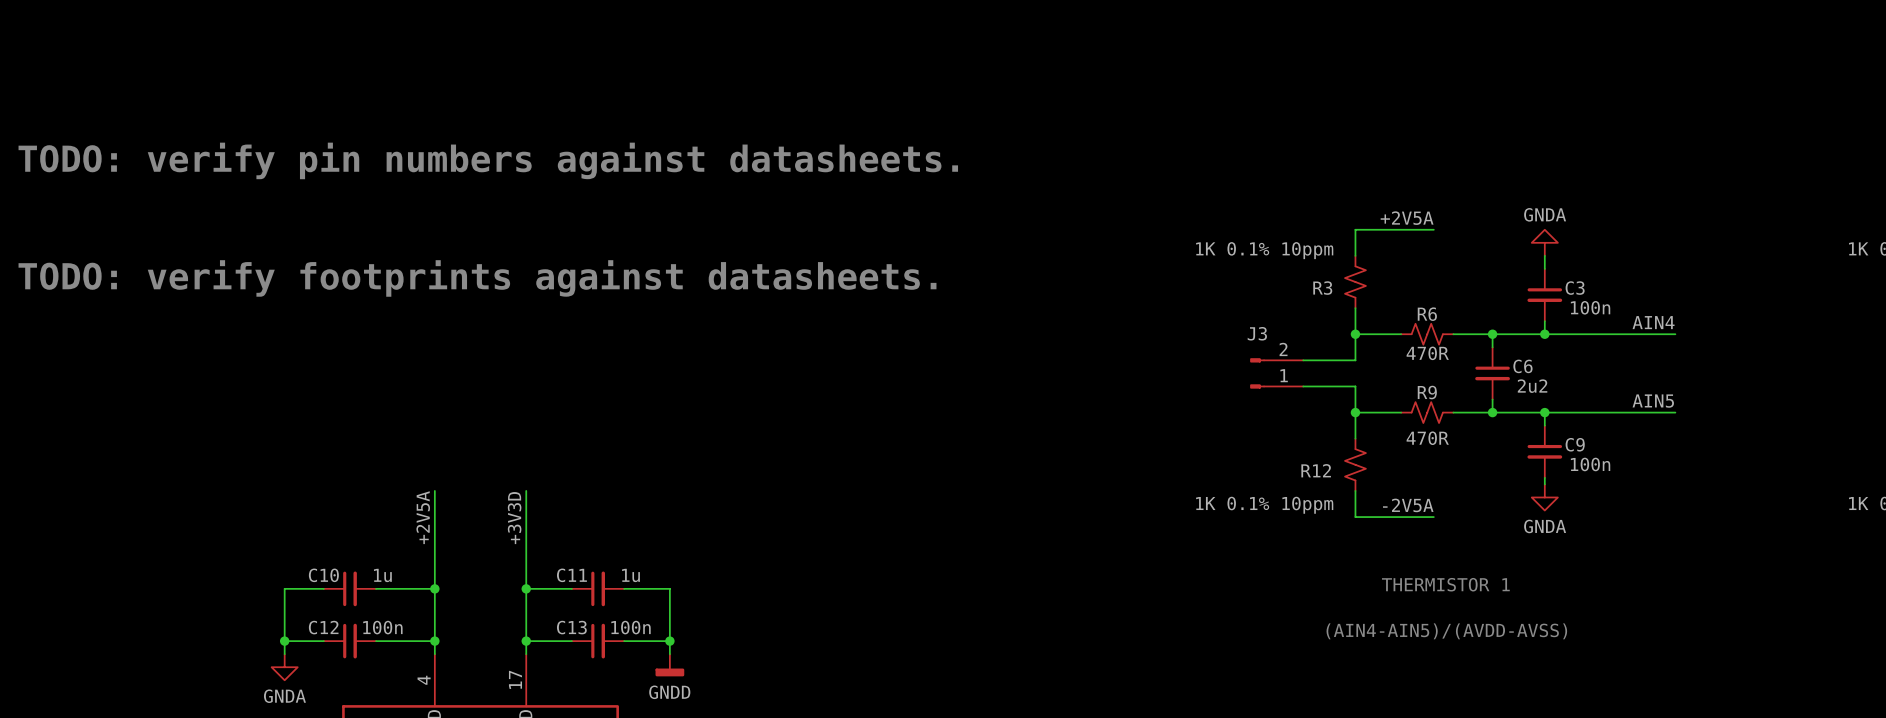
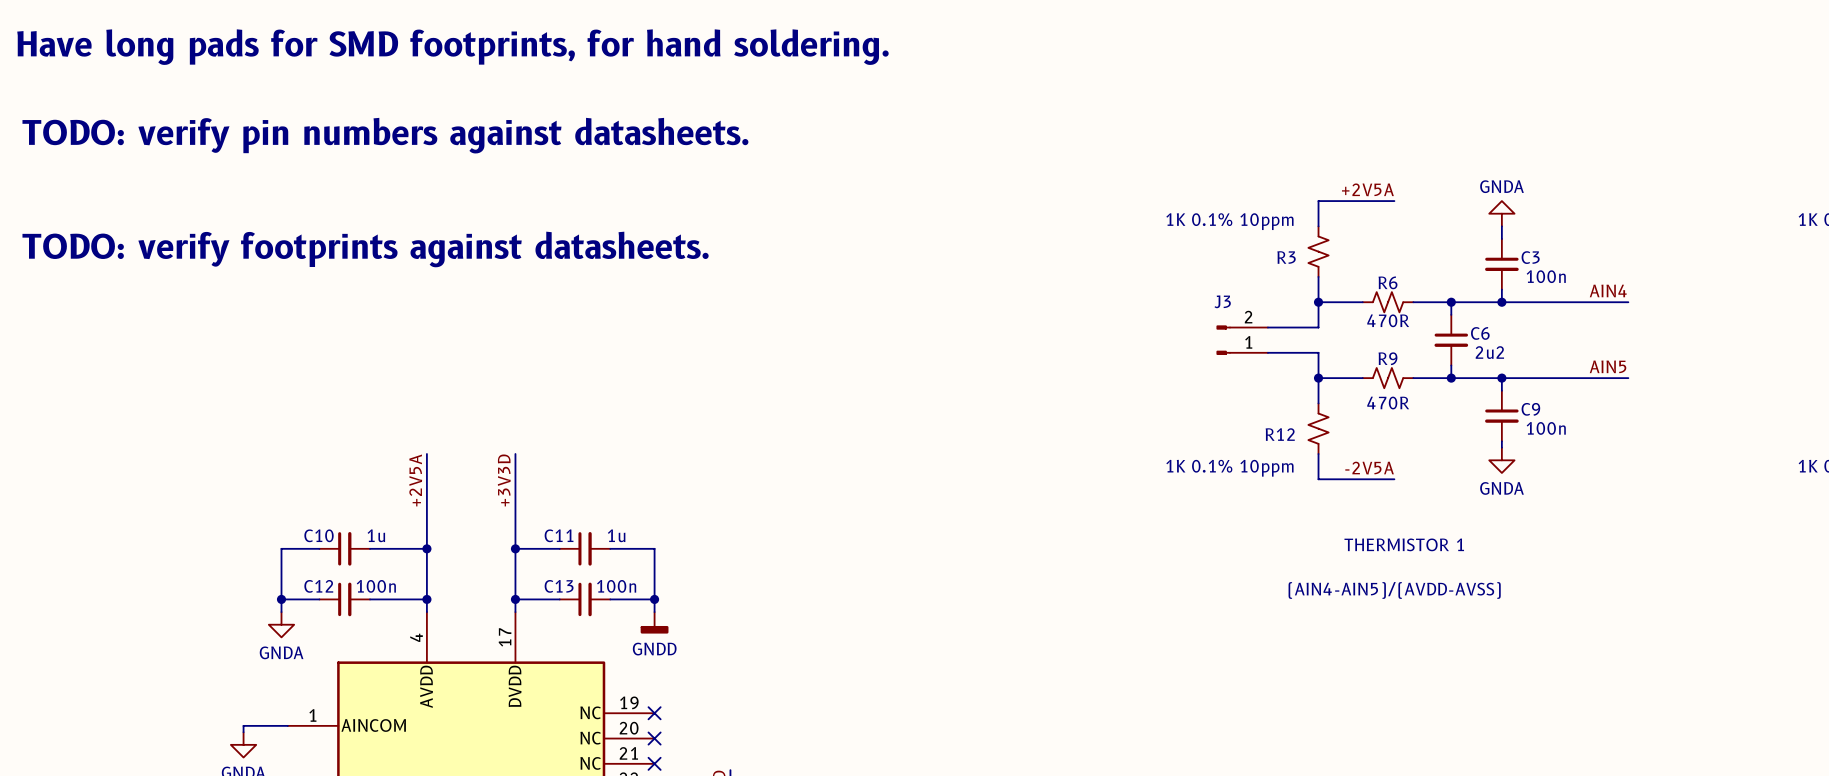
text: none -> Have long pads for SMD footprints, for hand soldering. (452, 47)

